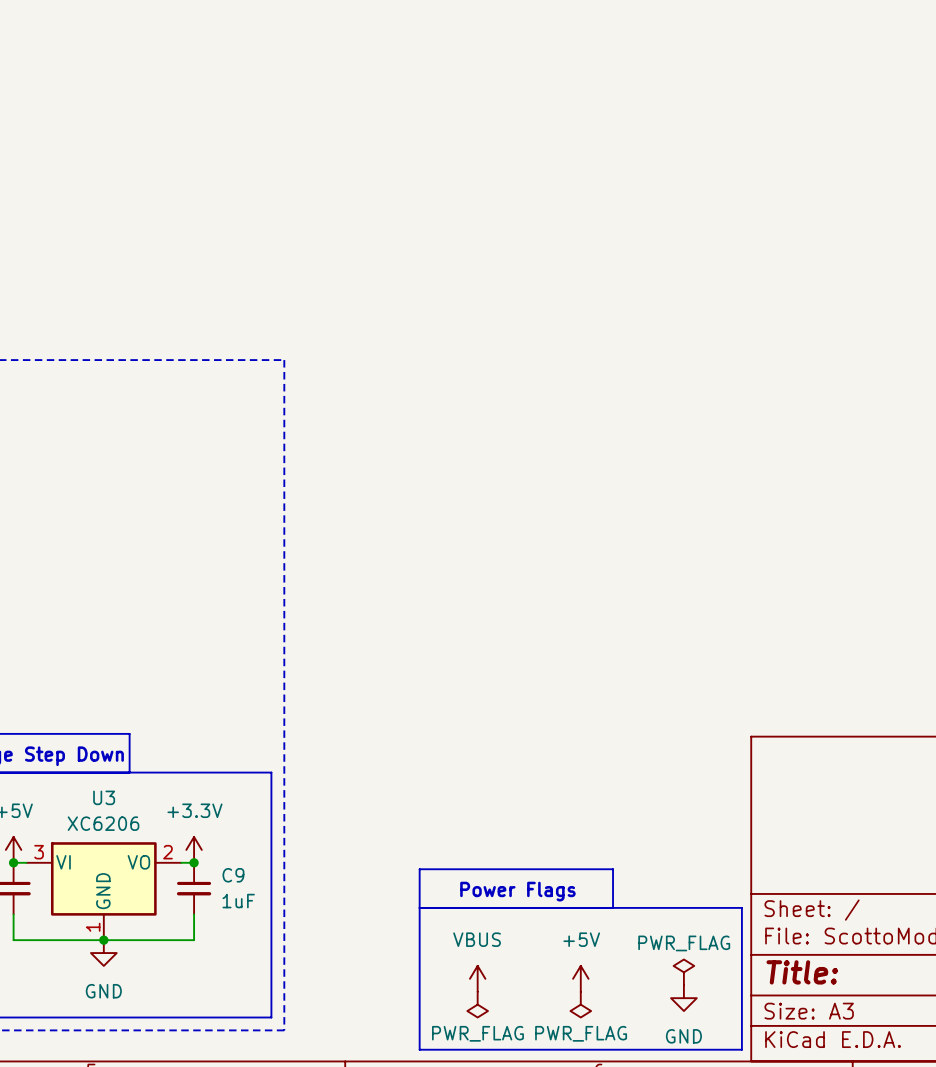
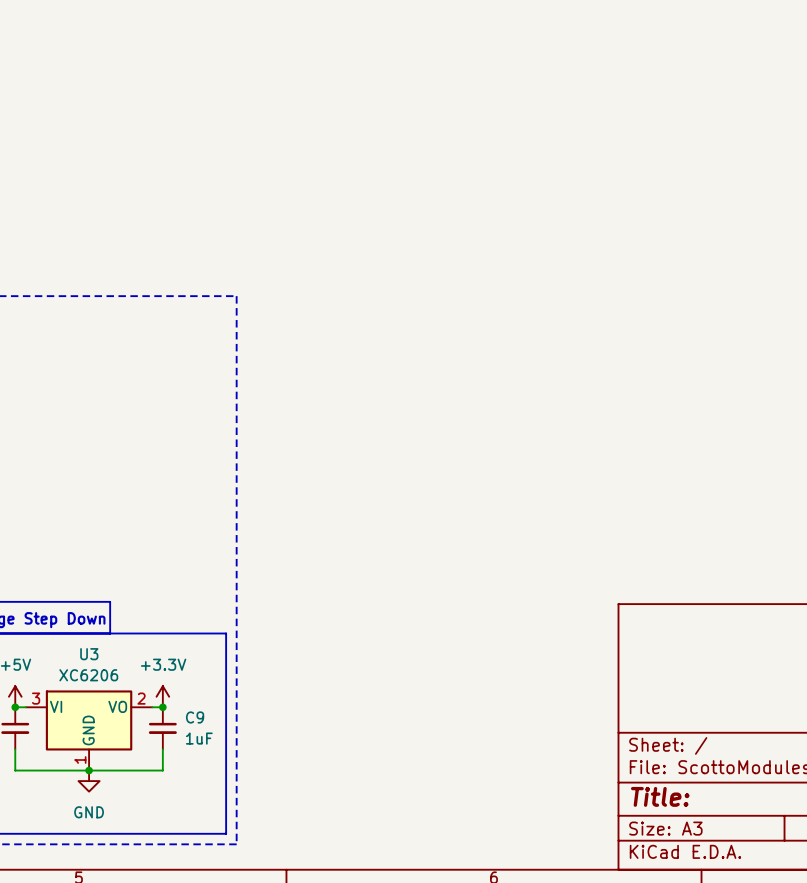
text: Power Flags (517, 891) -> none
line: (419, 907) (741, 907) (741, 1049) (419, 1049) (419, 869) (613, 869) (613, 907) -> none
power symbol: PWR_FLAG (683, 972) -> none
power symbol: VBUS (477, 978) -> none
power symbol: +5V (580, 978) -> none
power symbol: GND (683, 998) -> none
power symbol: PWR_FLAG (477, 1004) -> none
power symbol: PWR_FLAG (580, 1004) -> none

